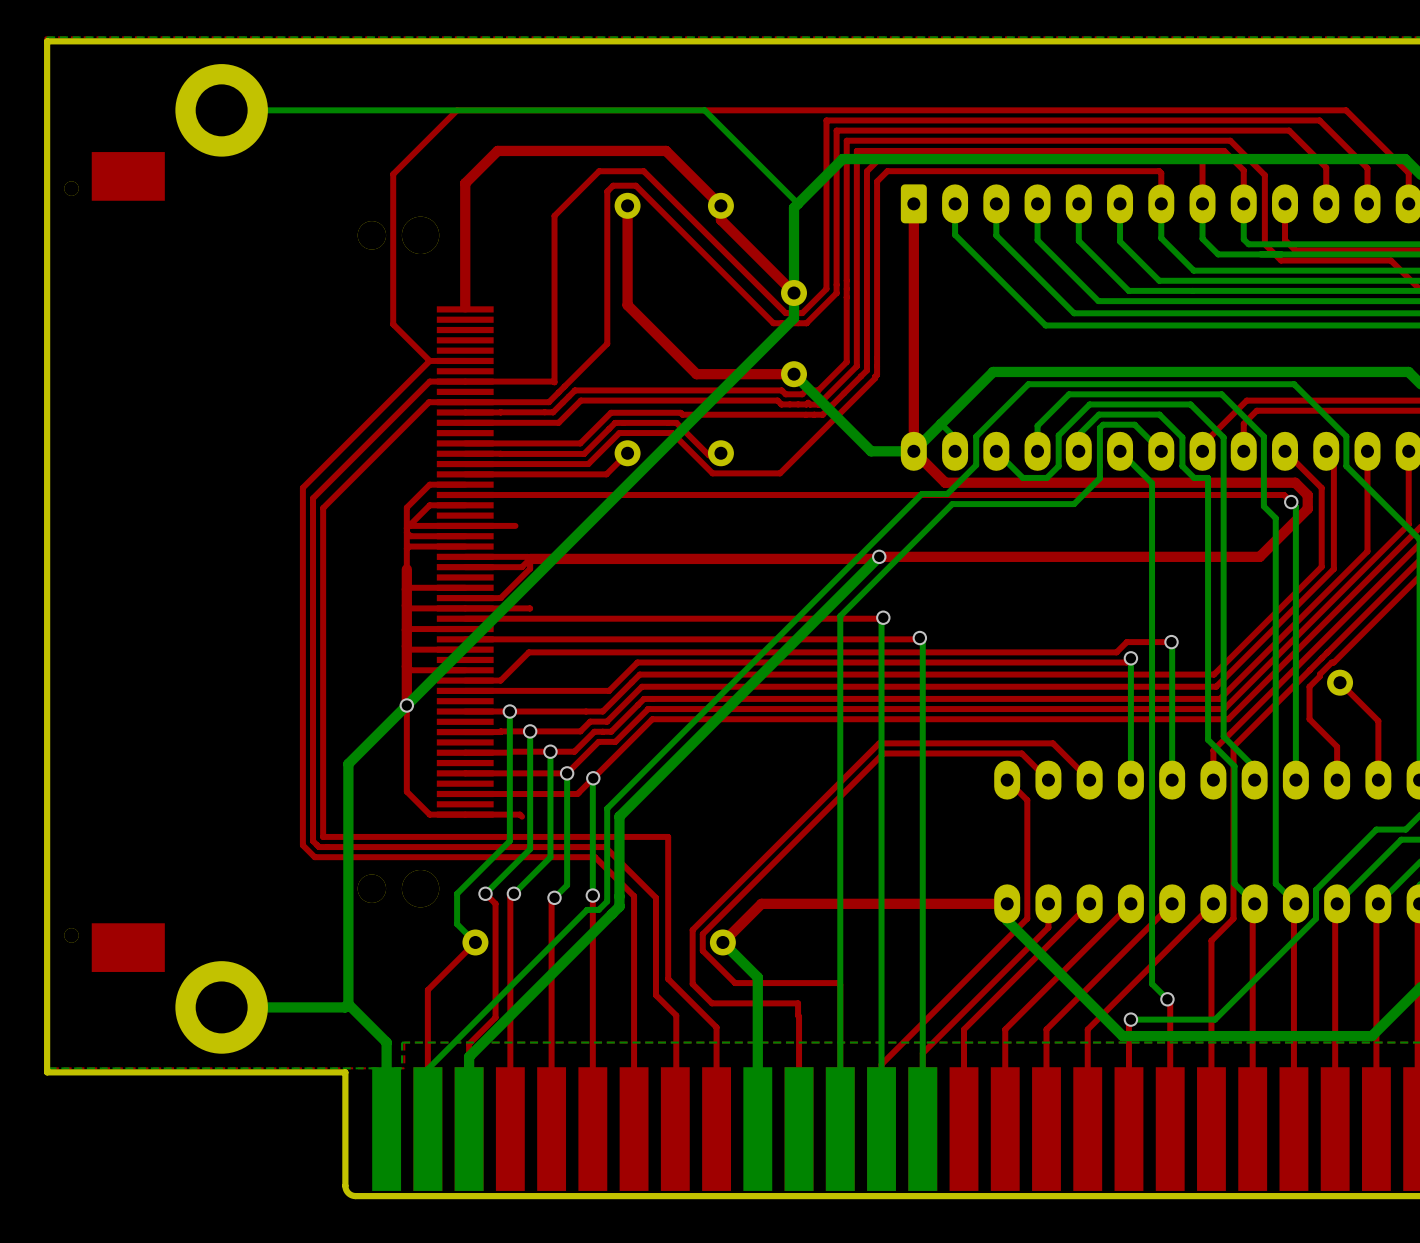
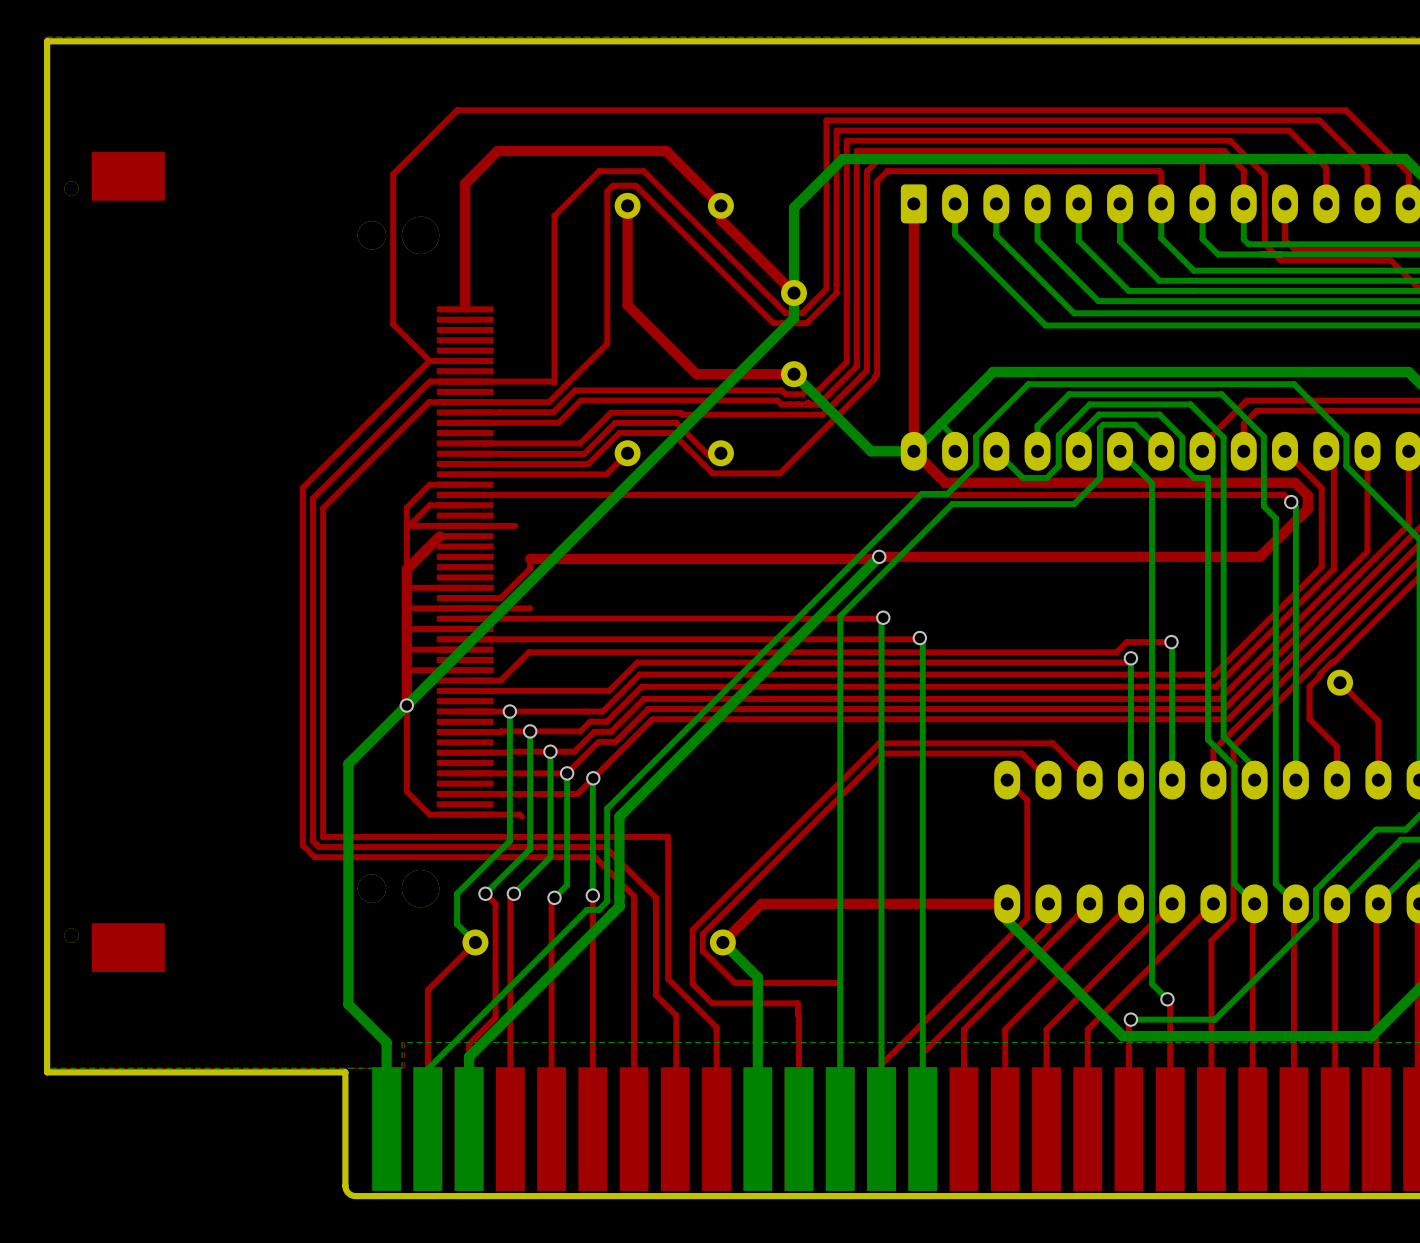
bottom track: (221, 110) (704, 110) (798, 203) -> none
part: (221, 110) -> none
top track: (406, 532) (410, 536) (439, 536) -> (406, 569) (439, 536)
top track: (465, 546) (409, 546) (406, 548) -> none
top track: (465, 556) (528, 556) (530, 558) (521, 567) (465, 567) -> none
bottom track: (348, 1004) (345, 1007) (221, 1007) -> none
part: (221, 1007) -> none

